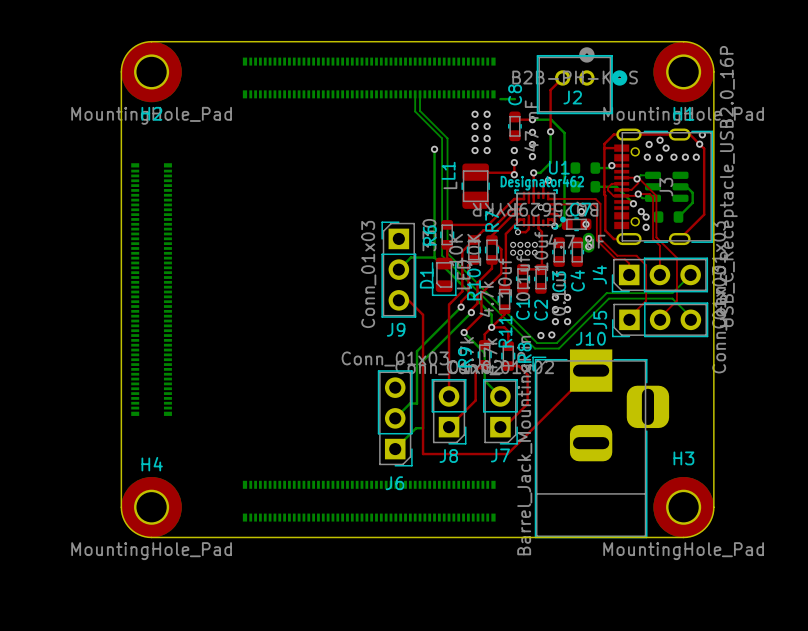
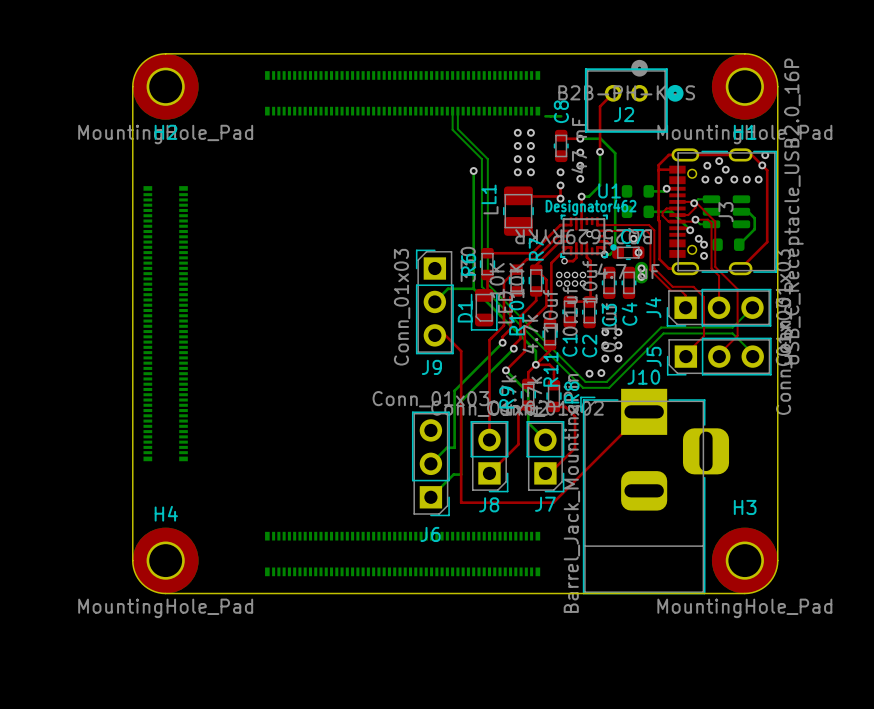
top track: (548, 180) (543, 185) (543, 195) -> none
via: (548, 180) -> none

